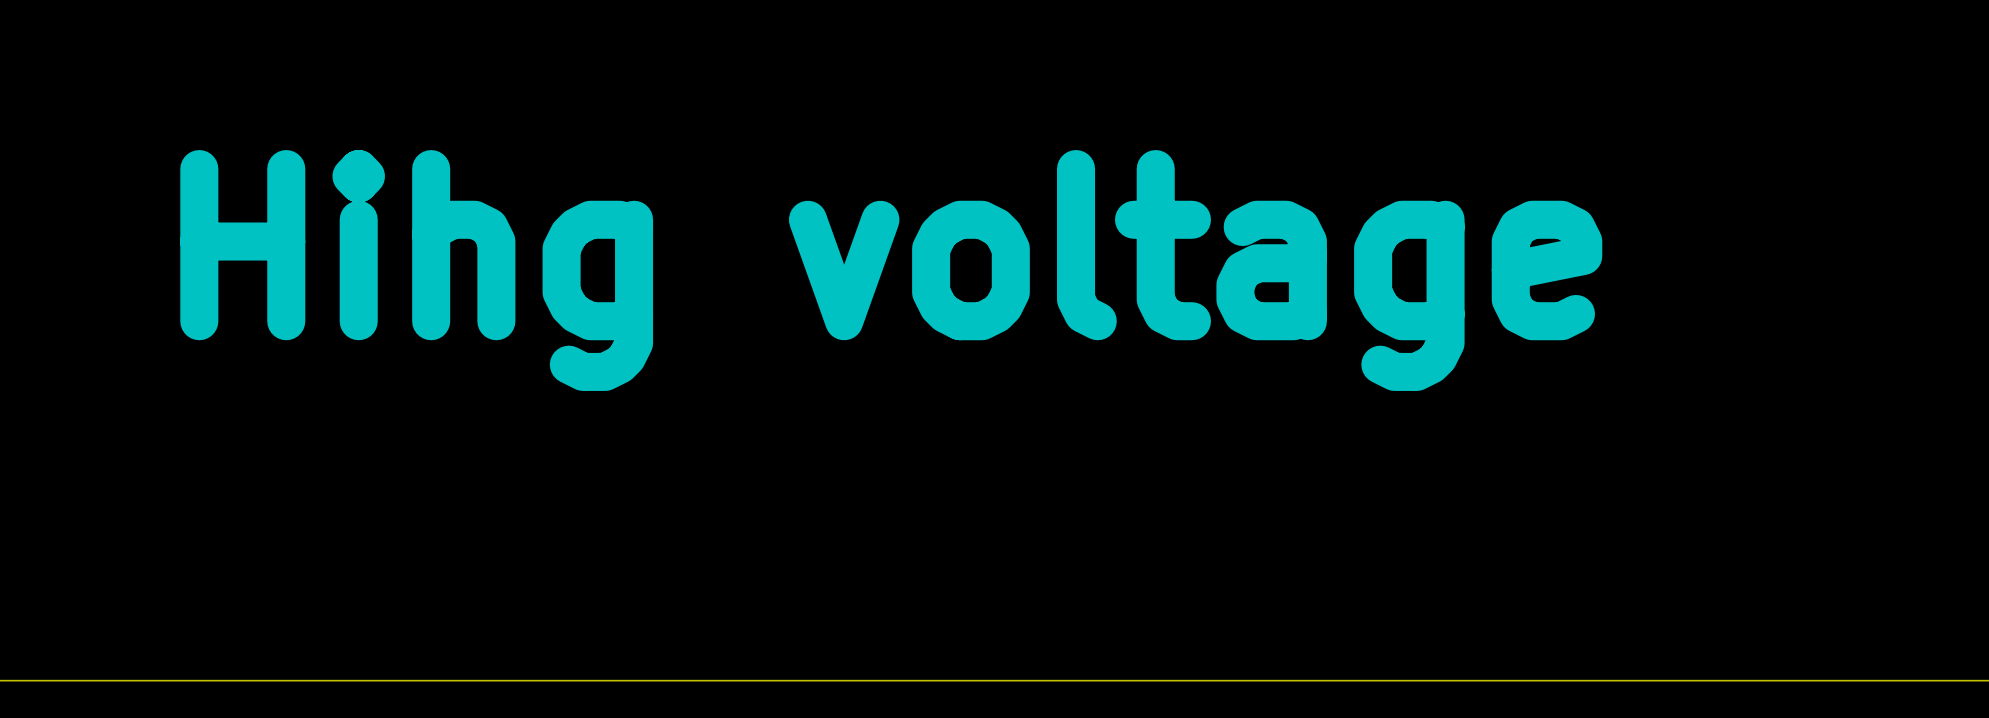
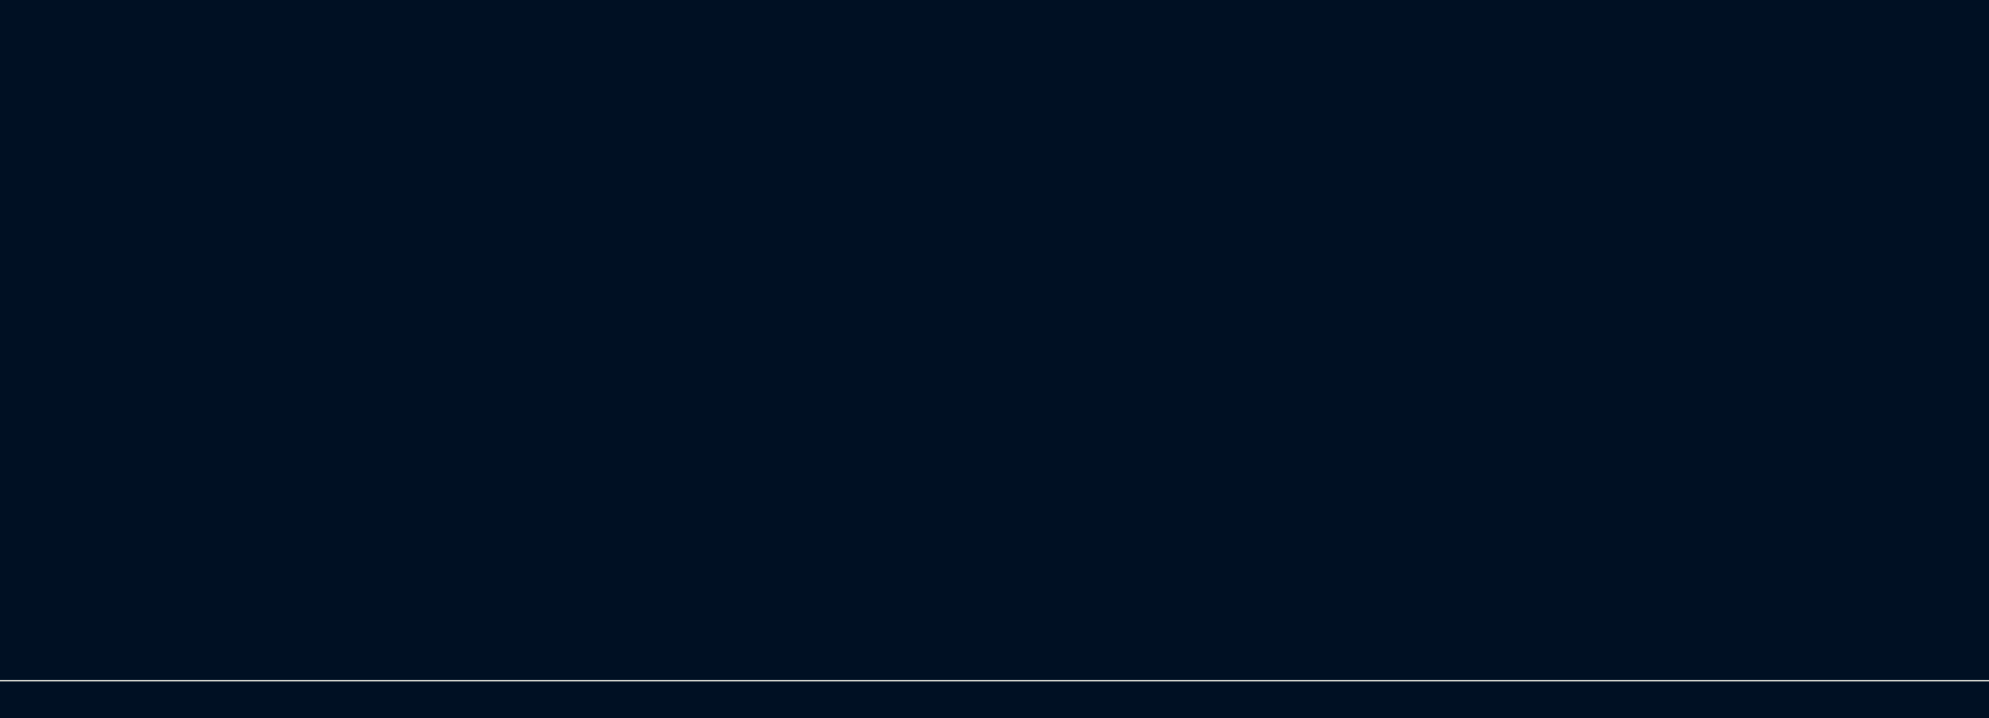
text: Hihg voltage (891, 270) -> none

